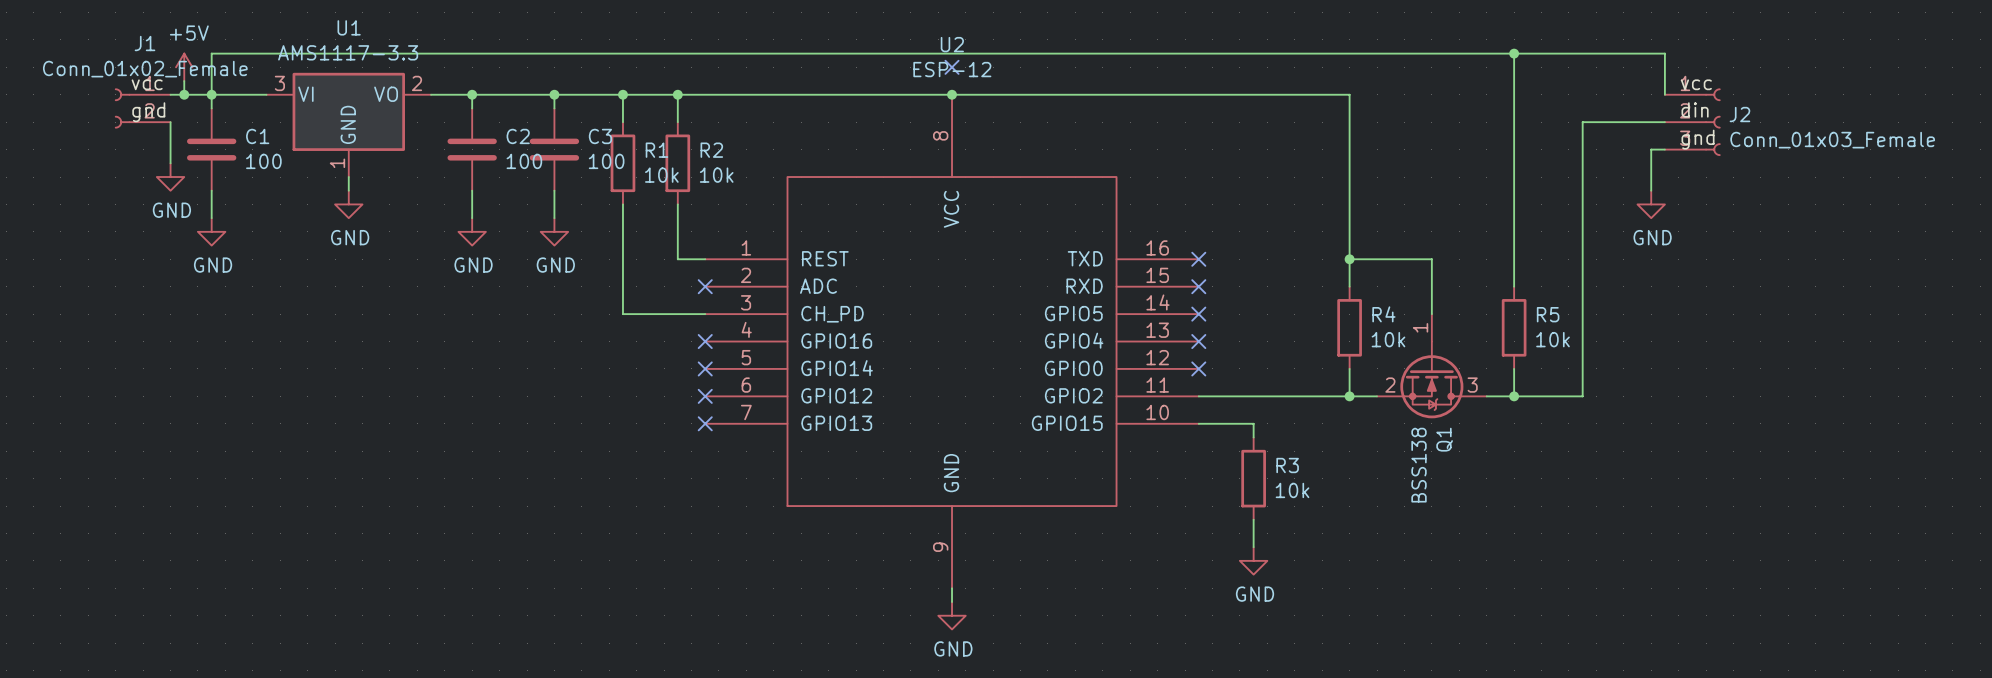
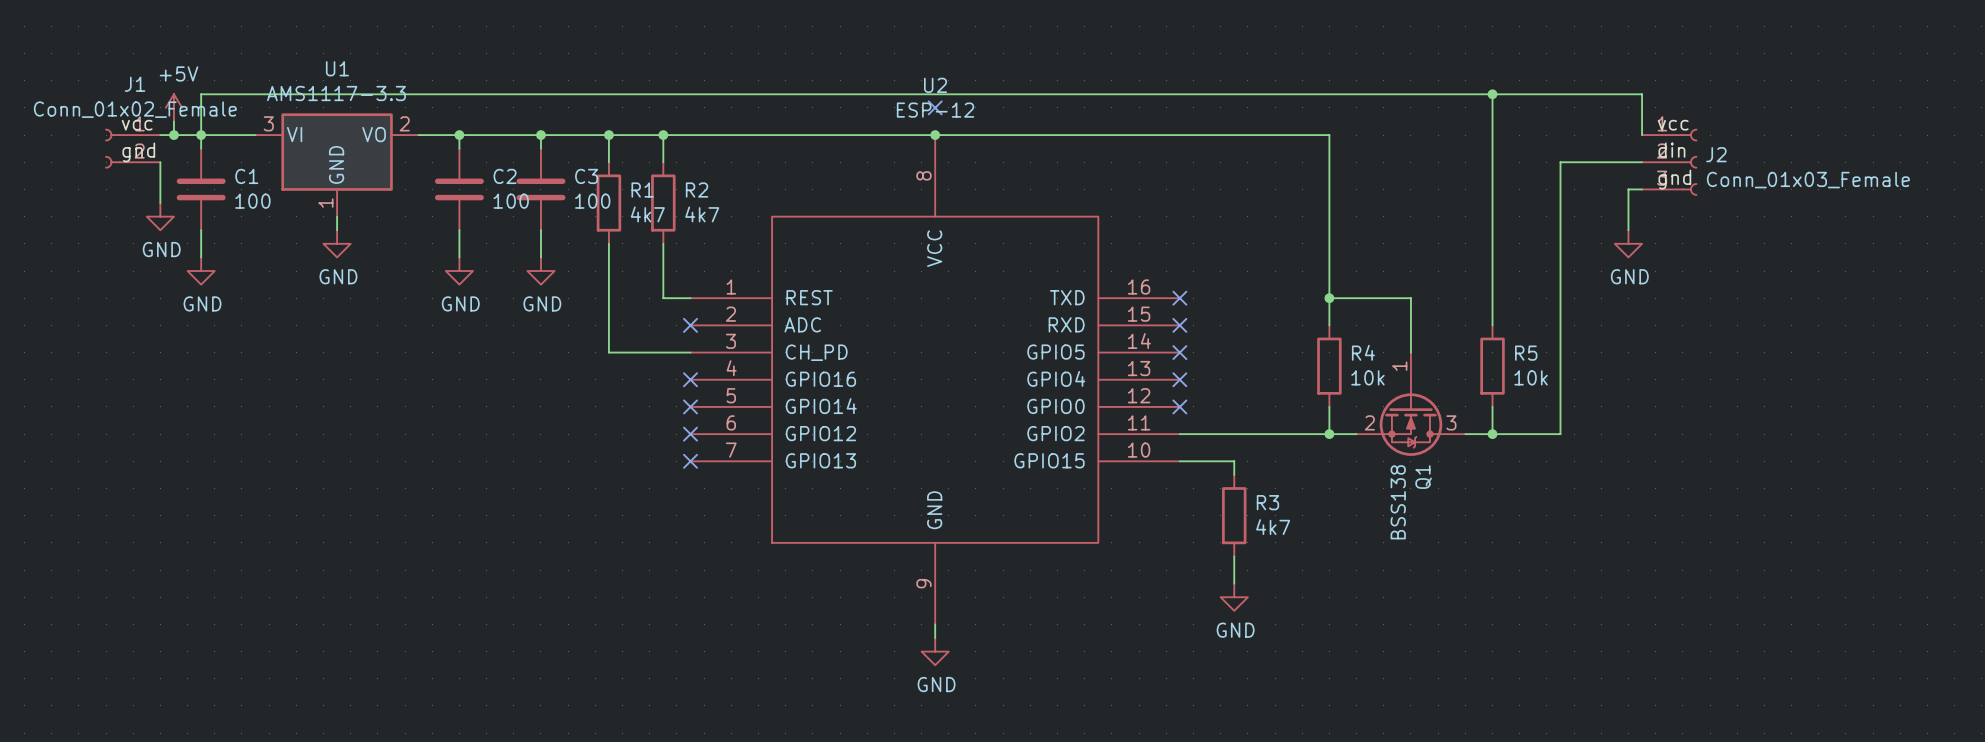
R1 value: 10k (661, 175) -> 4k7 (647, 214)
R2 value: 10k (716, 175) -> 4k7 (702, 214)
R3 value: 10k (1292, 490) -> 4k7 (1273, 527)

